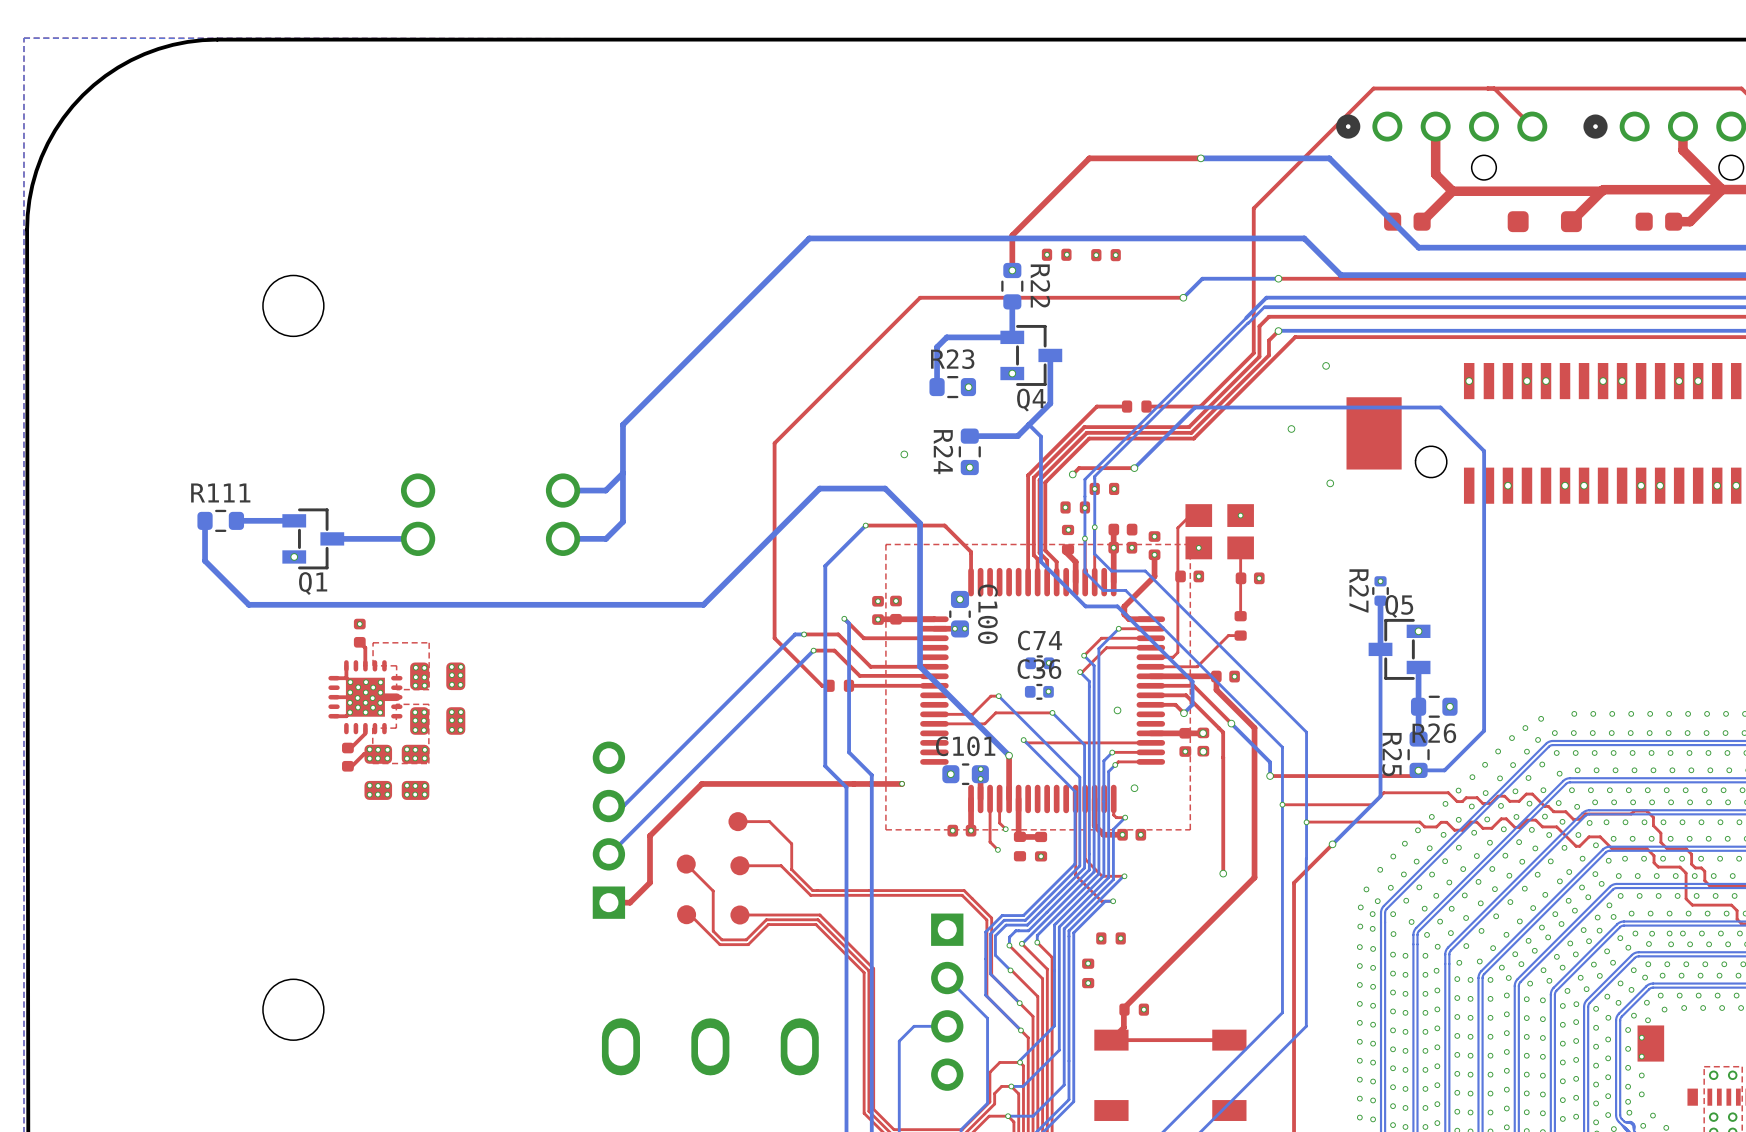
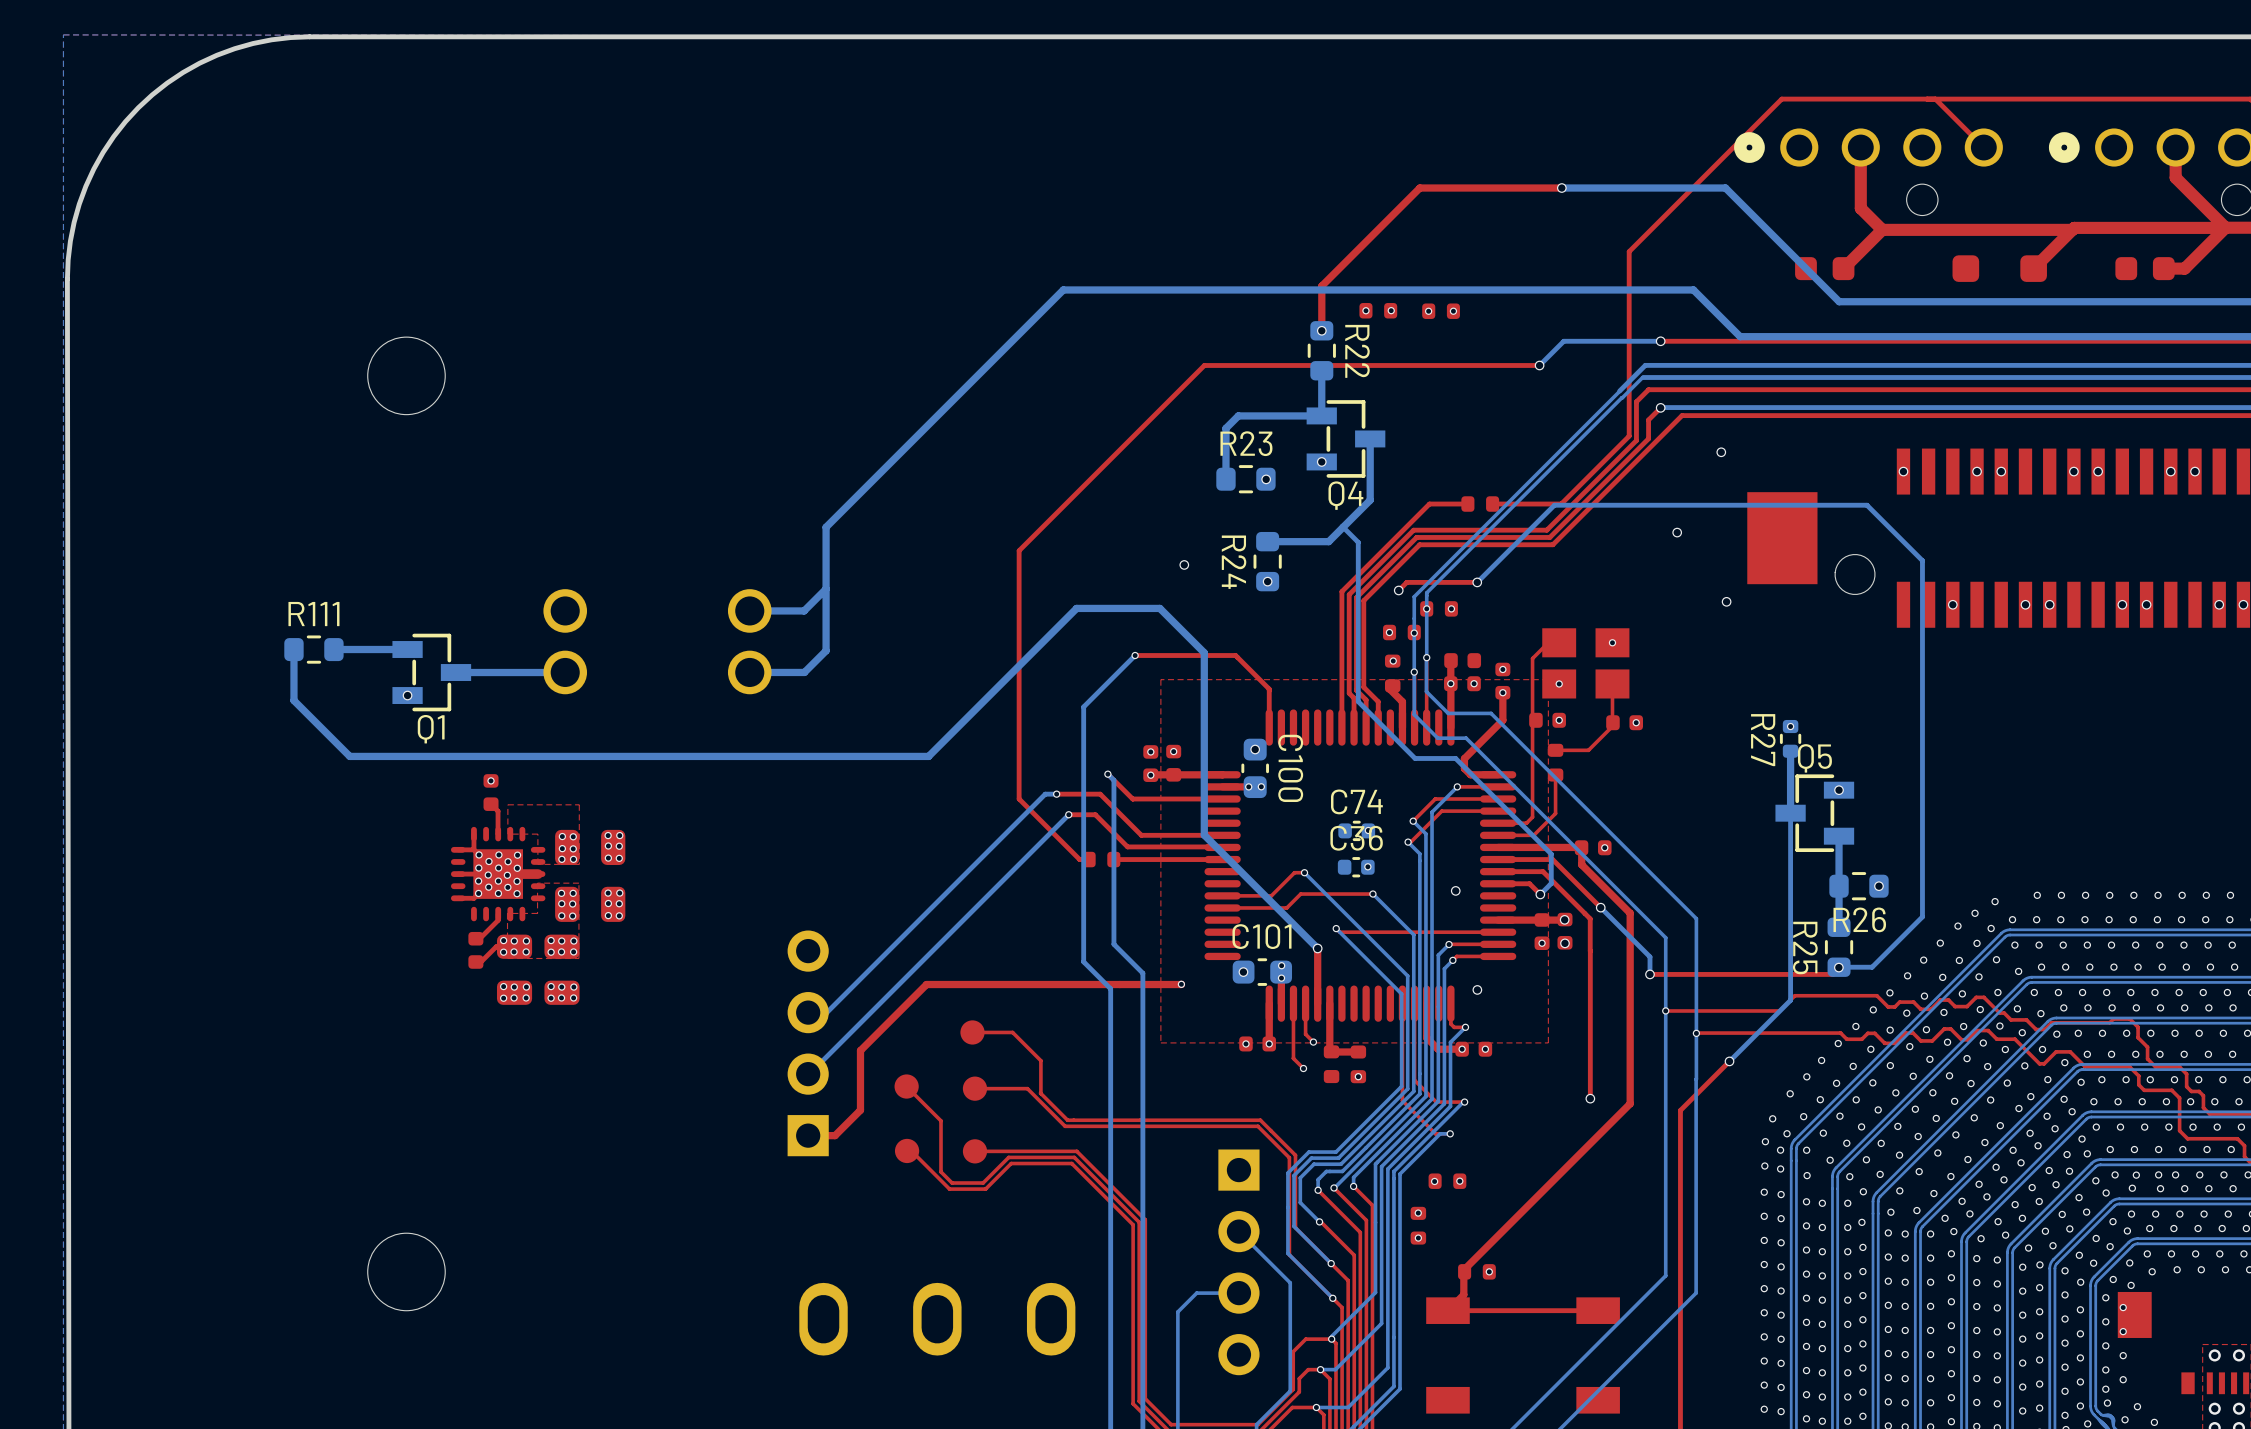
top track: (1240, 581) (1240, 616) -> (1612, 726) (1588, 750) (1555, 750)
part position: (1240, 625) -> (1555, 762)
top track: (1240, 635) (1228, 635) (1197, 666) (1178, 666) -> (1555, 775) (1555, 813) (1533, 835)

